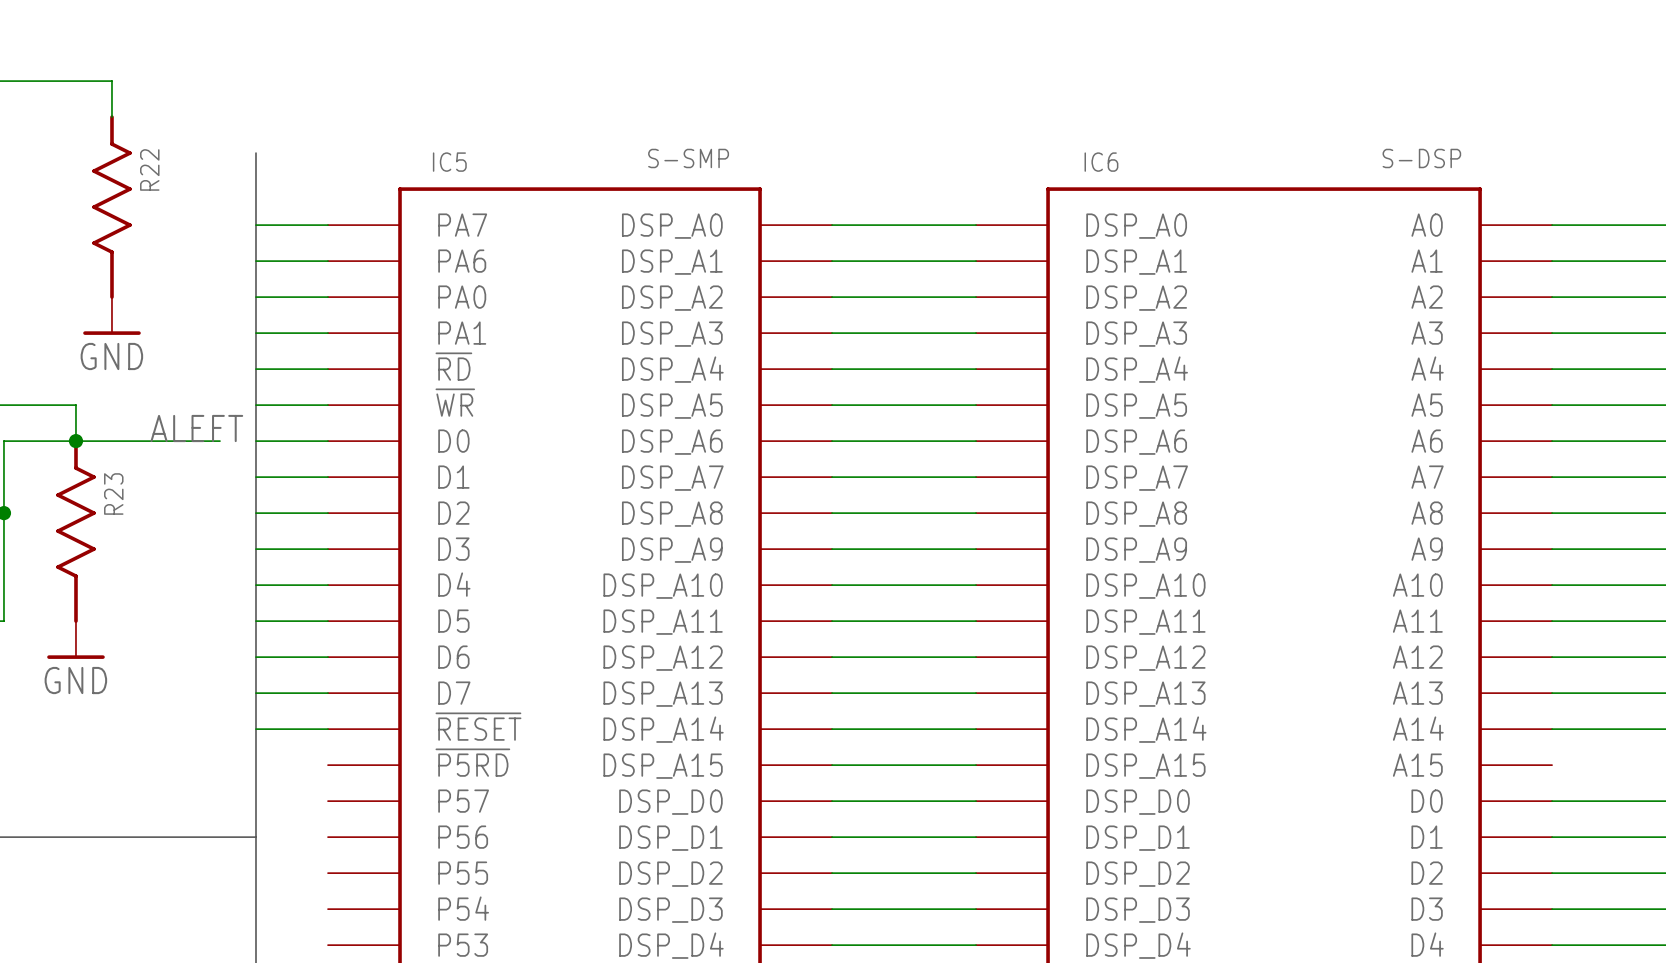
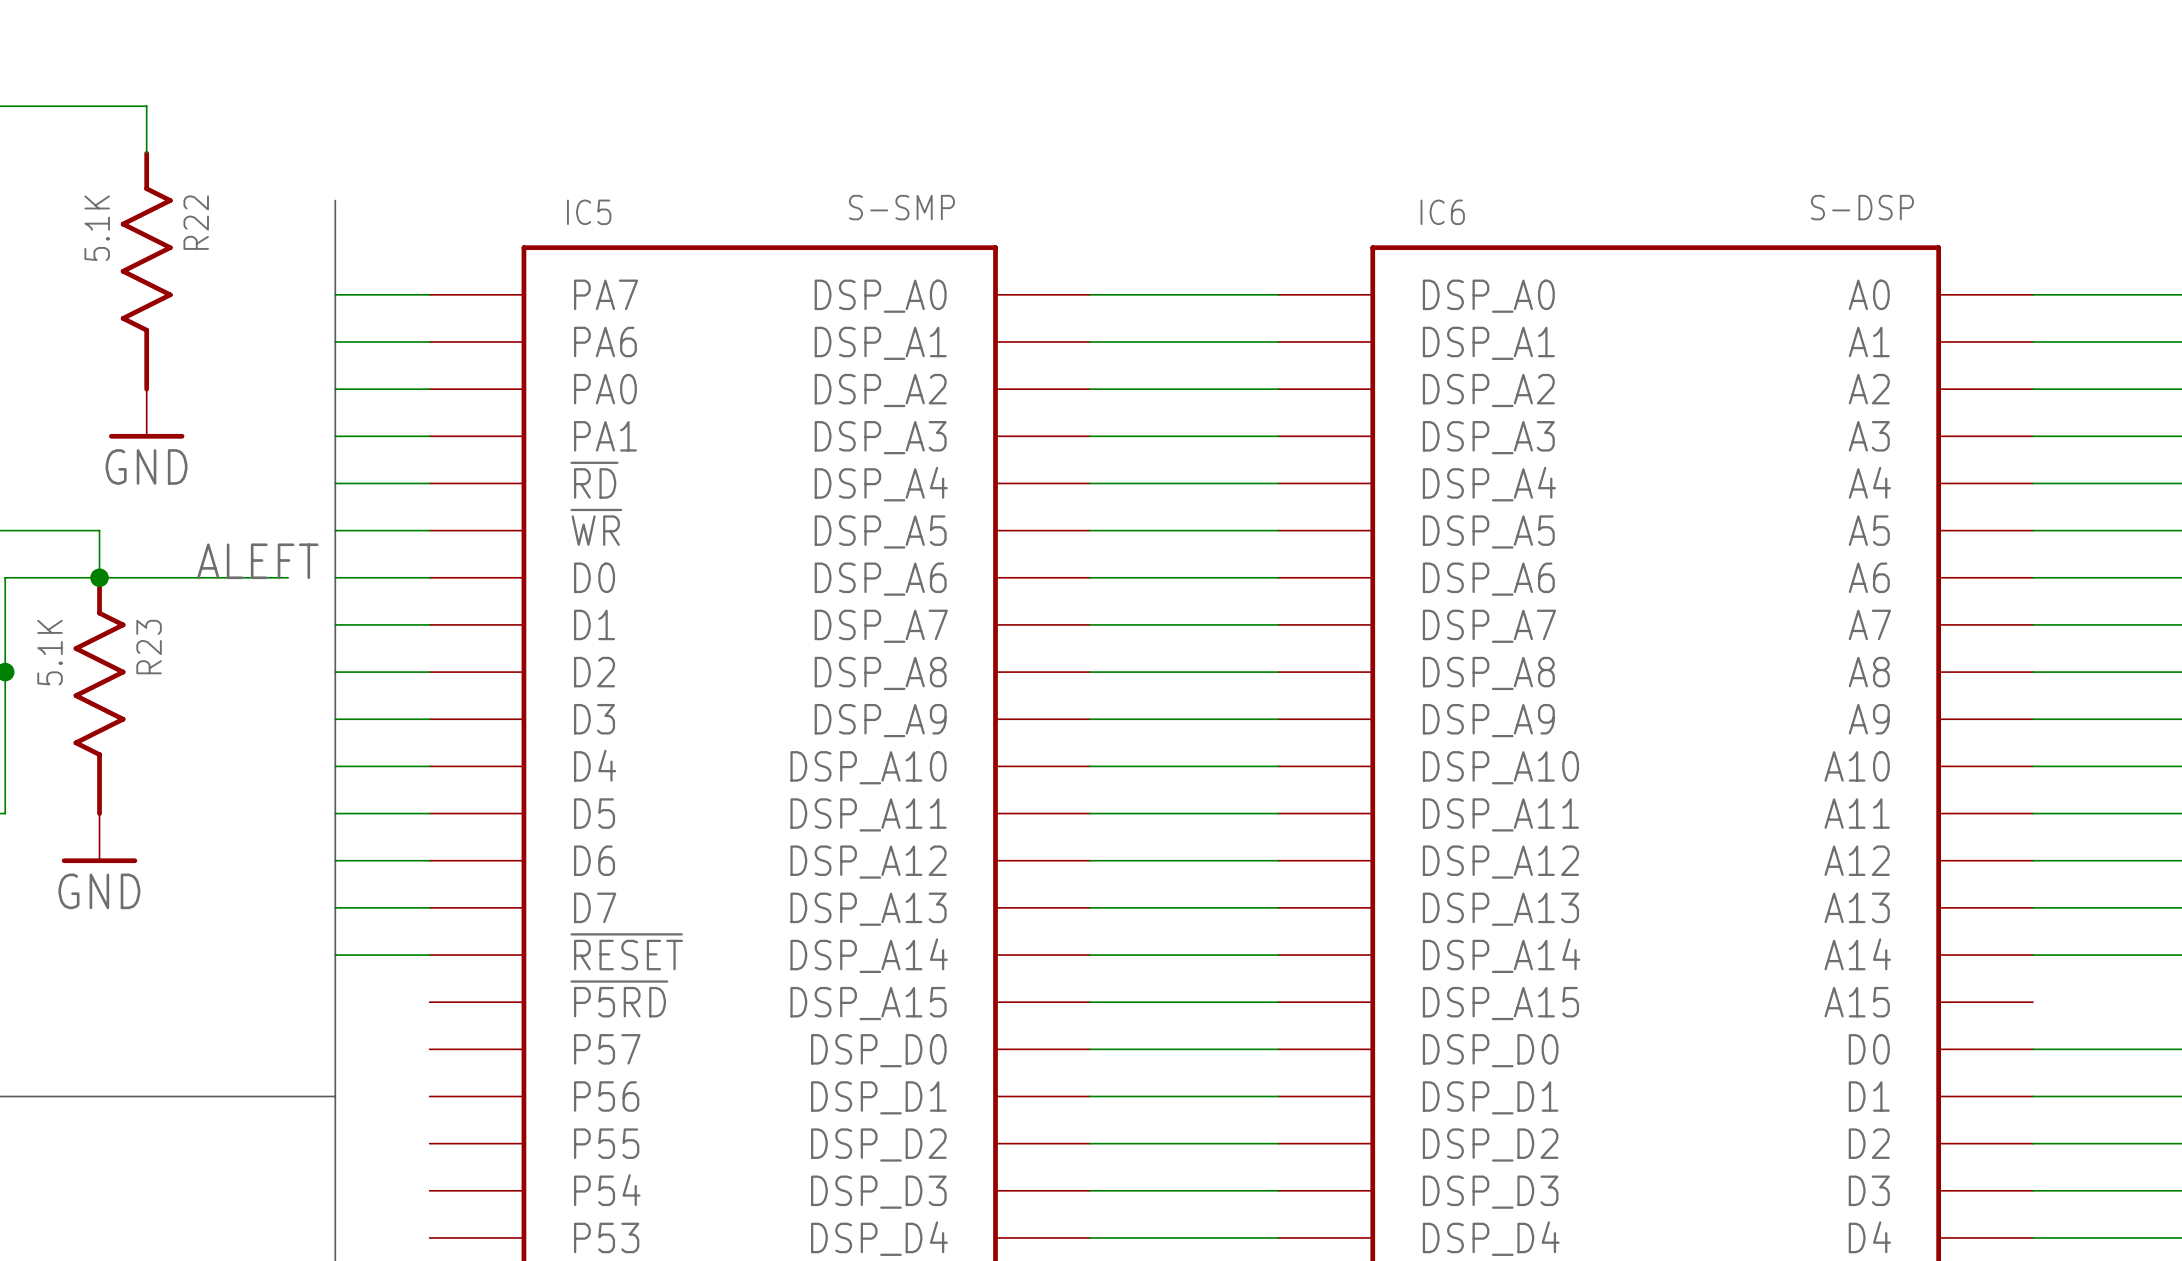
R22 value: none -> 5.1K (97, 228)
R23 value: none -> 5.1K (50, 652)

